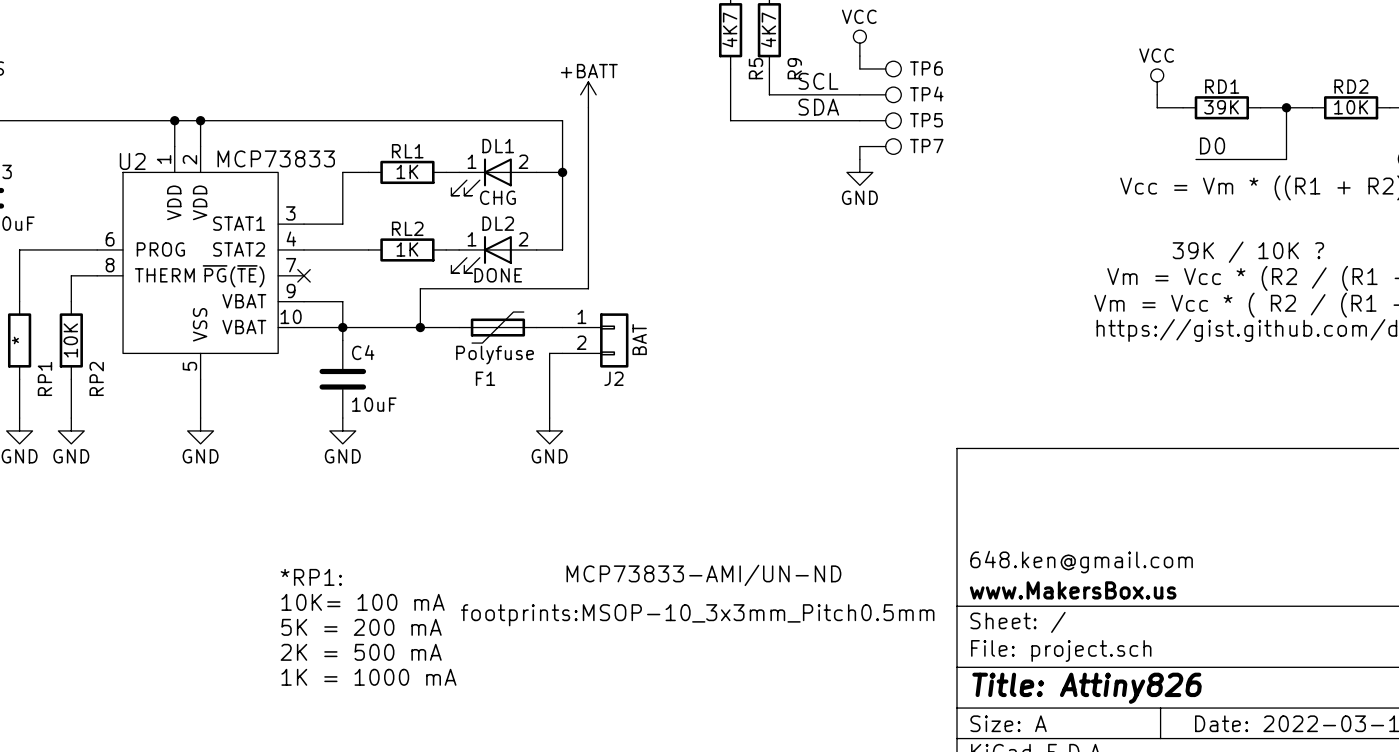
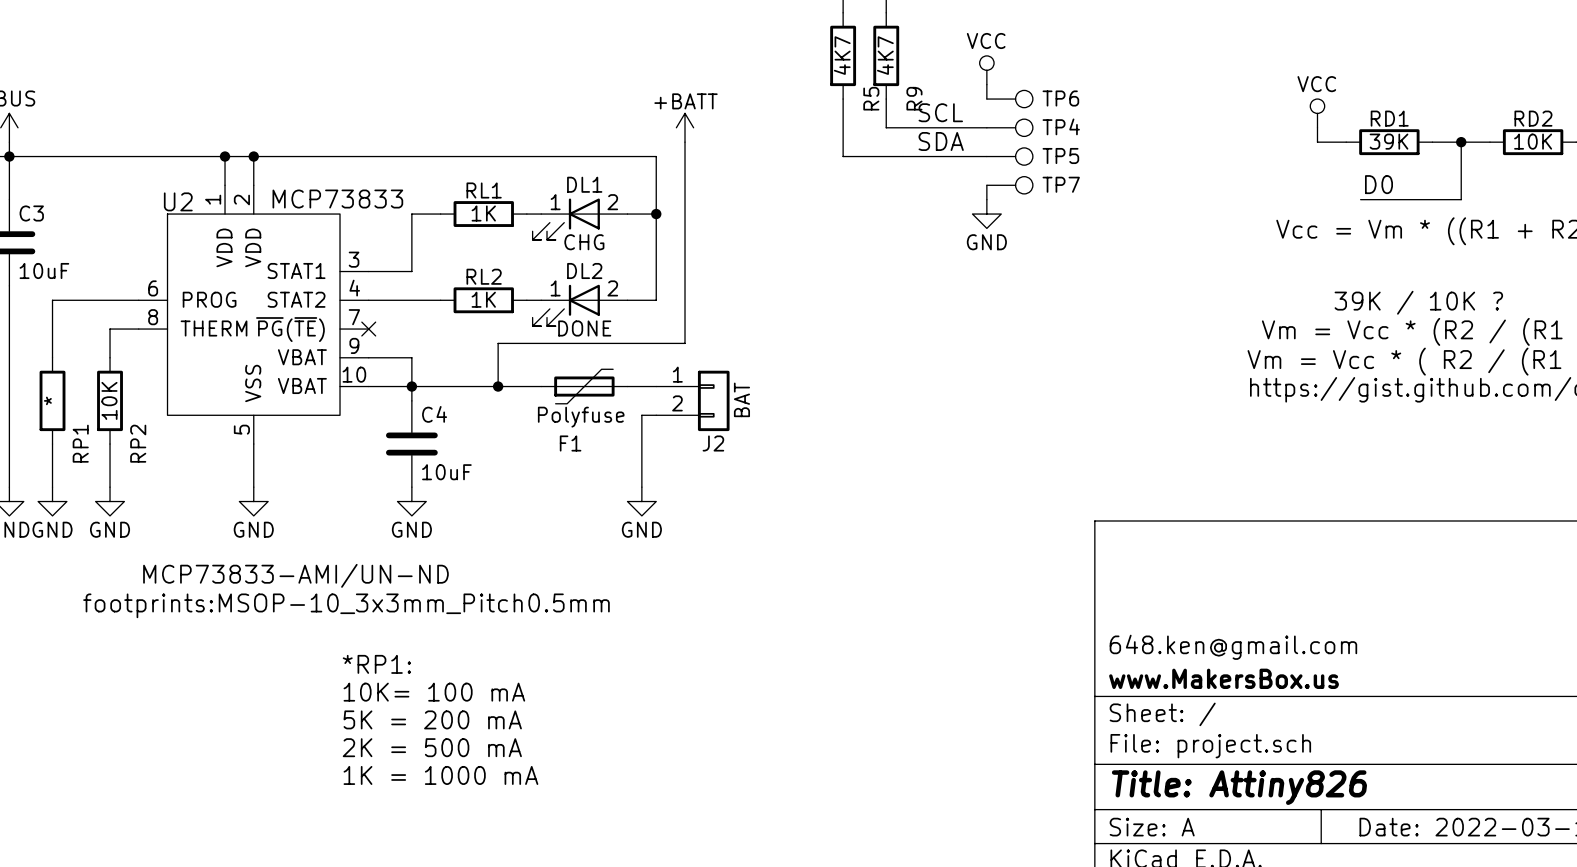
text: none -> MCP73833-AMI/UN-ND (295, 575)
text: none -> footprints:MSOP-10_3x3mm_Pitch0.5mm (346, 605)
text: MCP73833-AMI/UN-ND (703, 575) -> none
text: footprints:MSOP-10_3x3mm_Pitch0.5mm (697, 615) -> none

